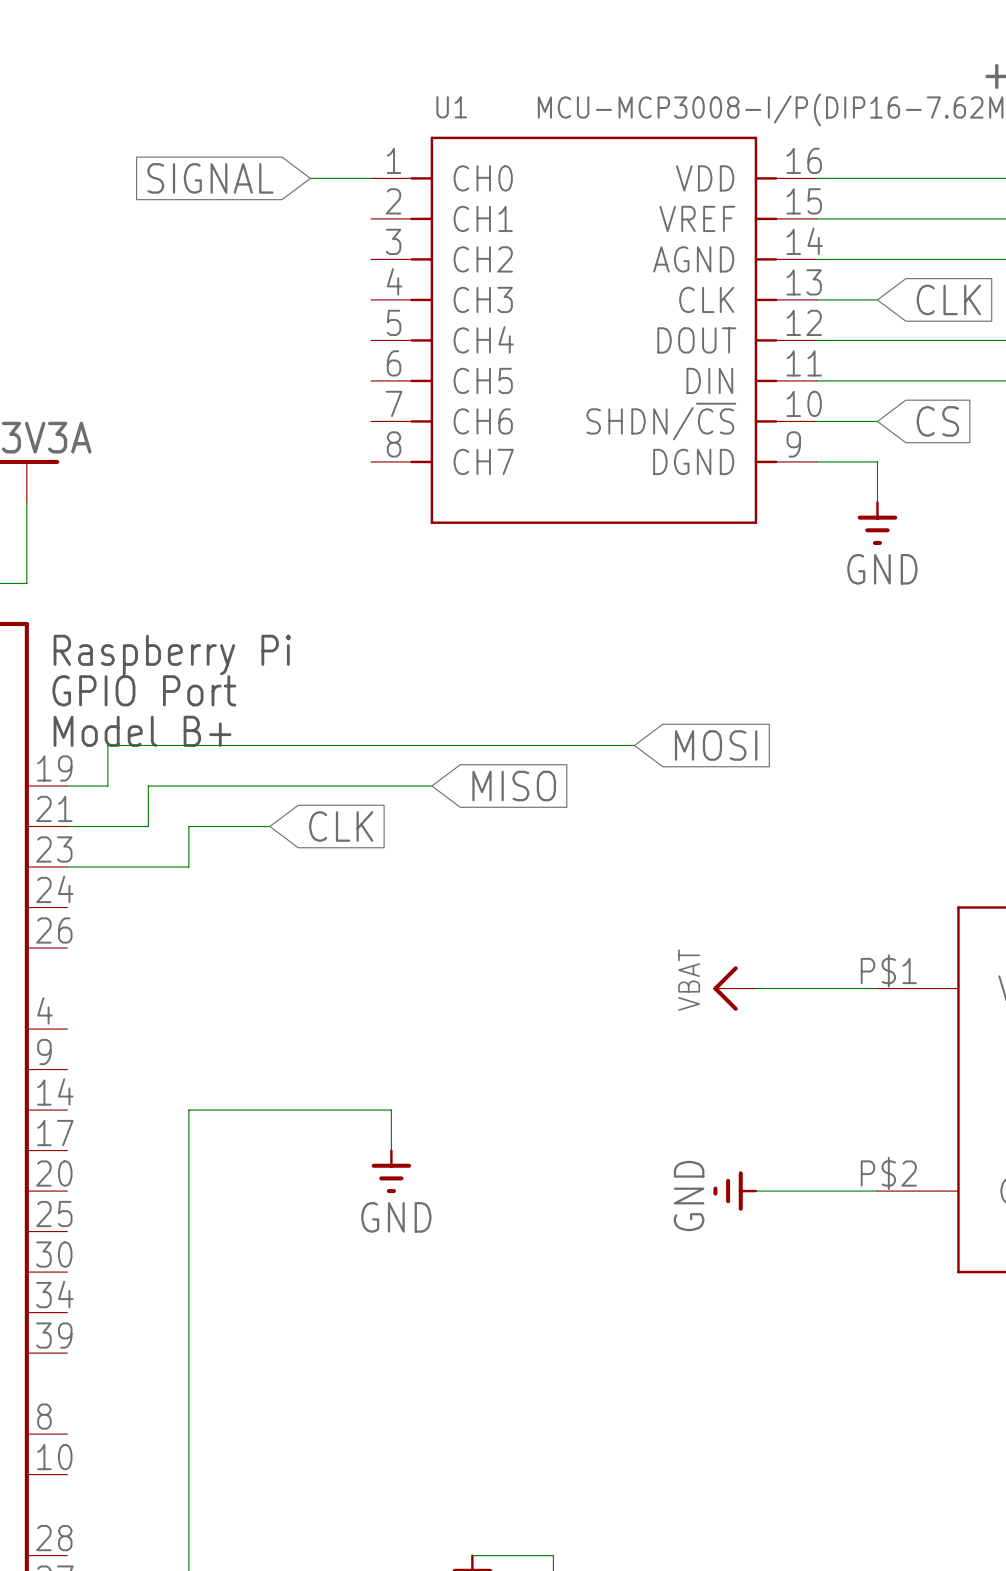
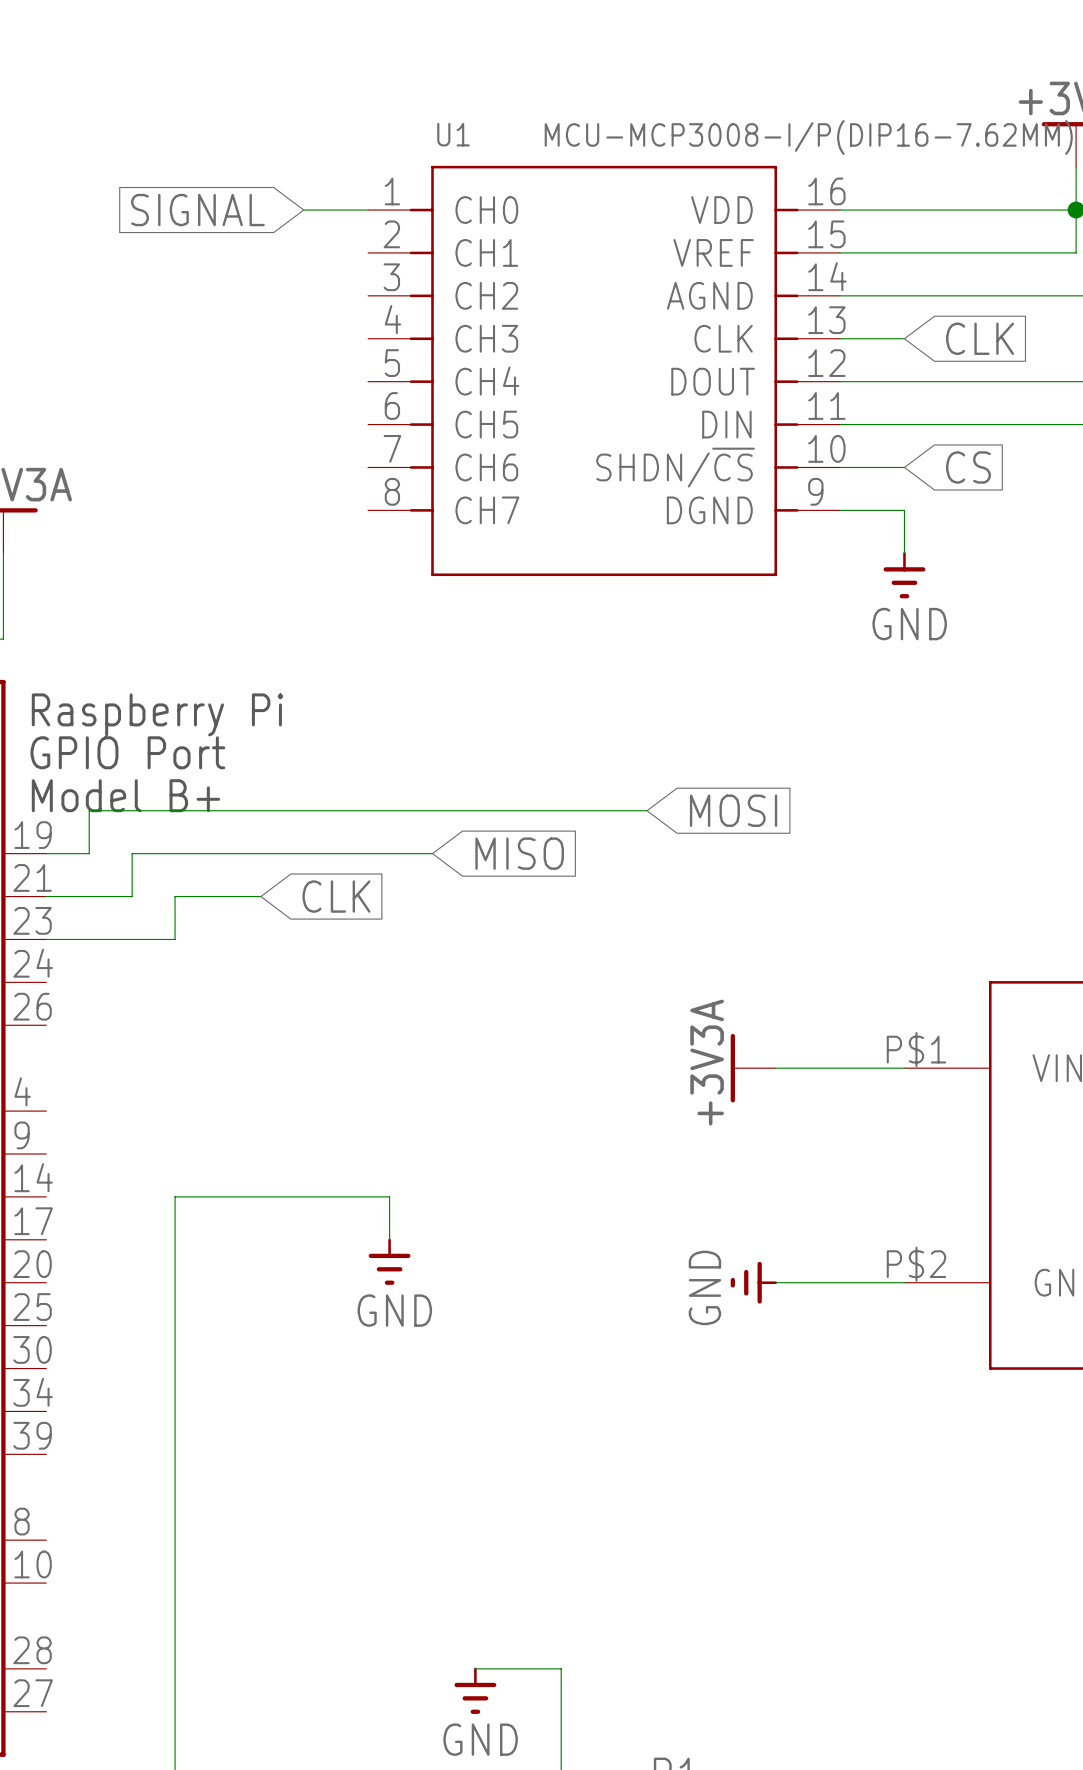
power symbol: VBAT (734, 988) -> +3V3A (753, 1068)

